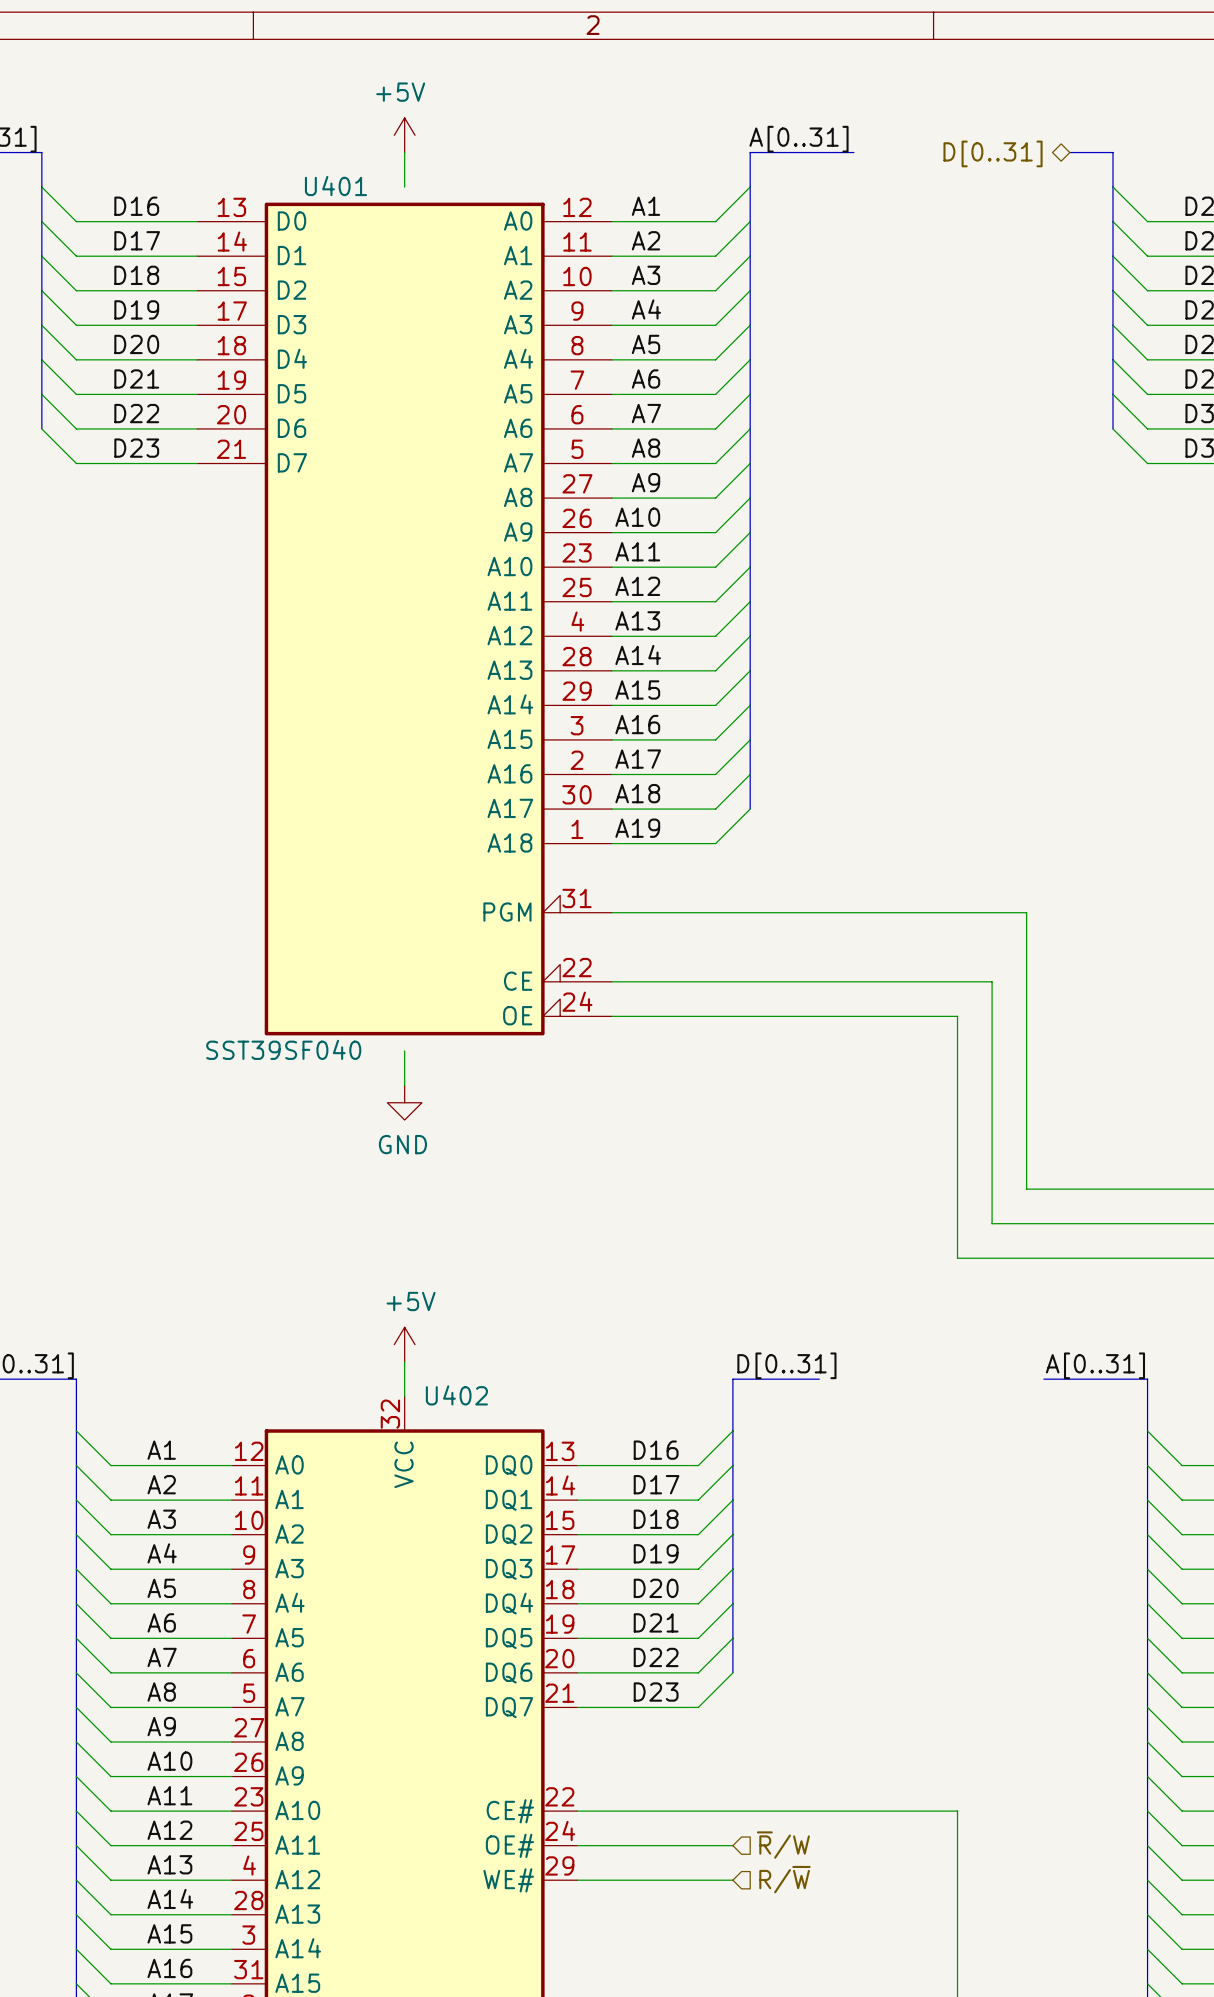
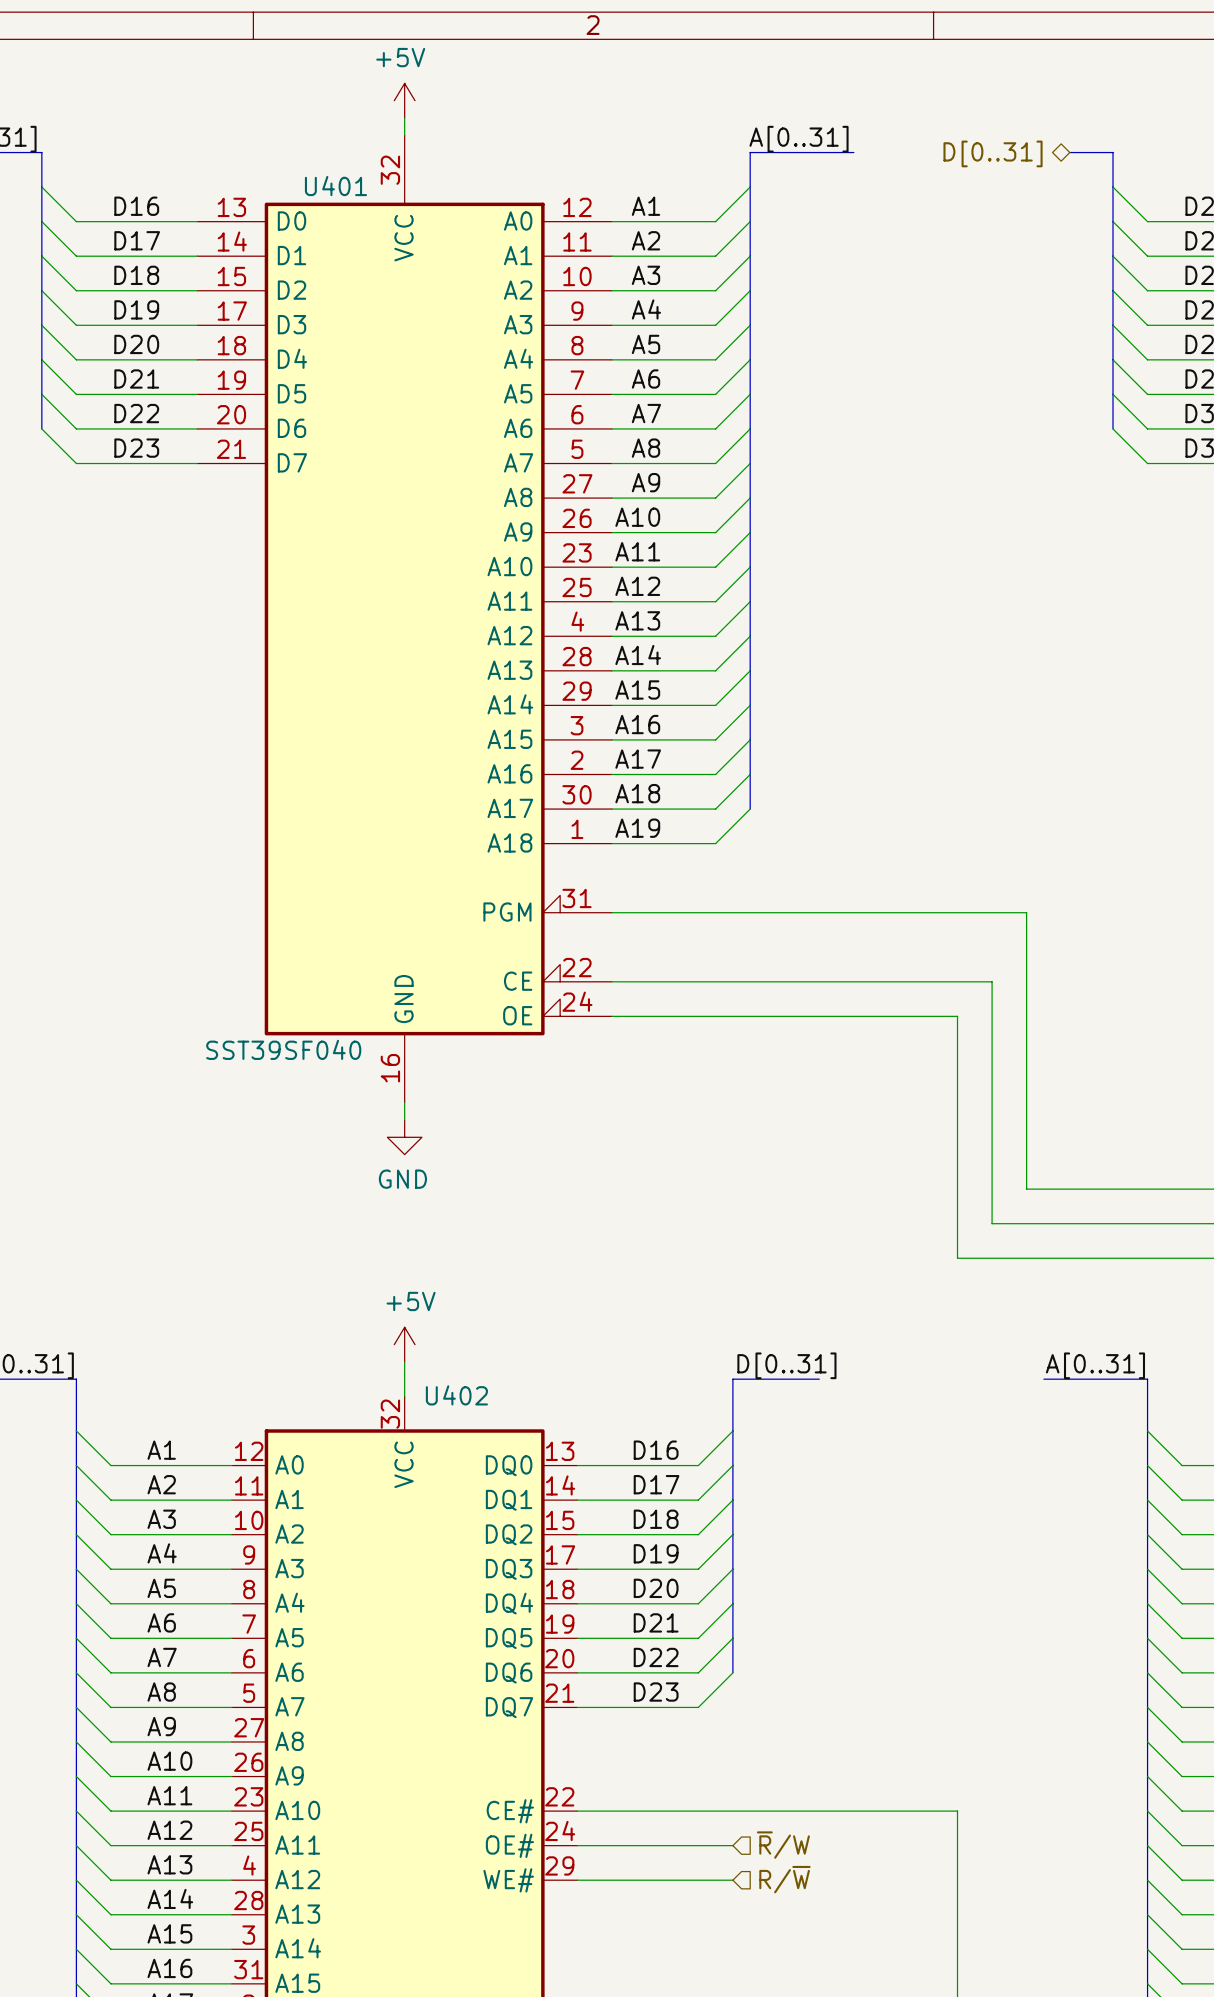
power symbol position: +5V (404, 135) -> +5V (404, 100)
U401 symbol: [197, 202, 612, 1036] -> [197, 135, 612, 1103]
wire: none -> (404, 1102) (404, 1120)
power symbol position: GND (404, 1102) -> GND (404, 1137)

